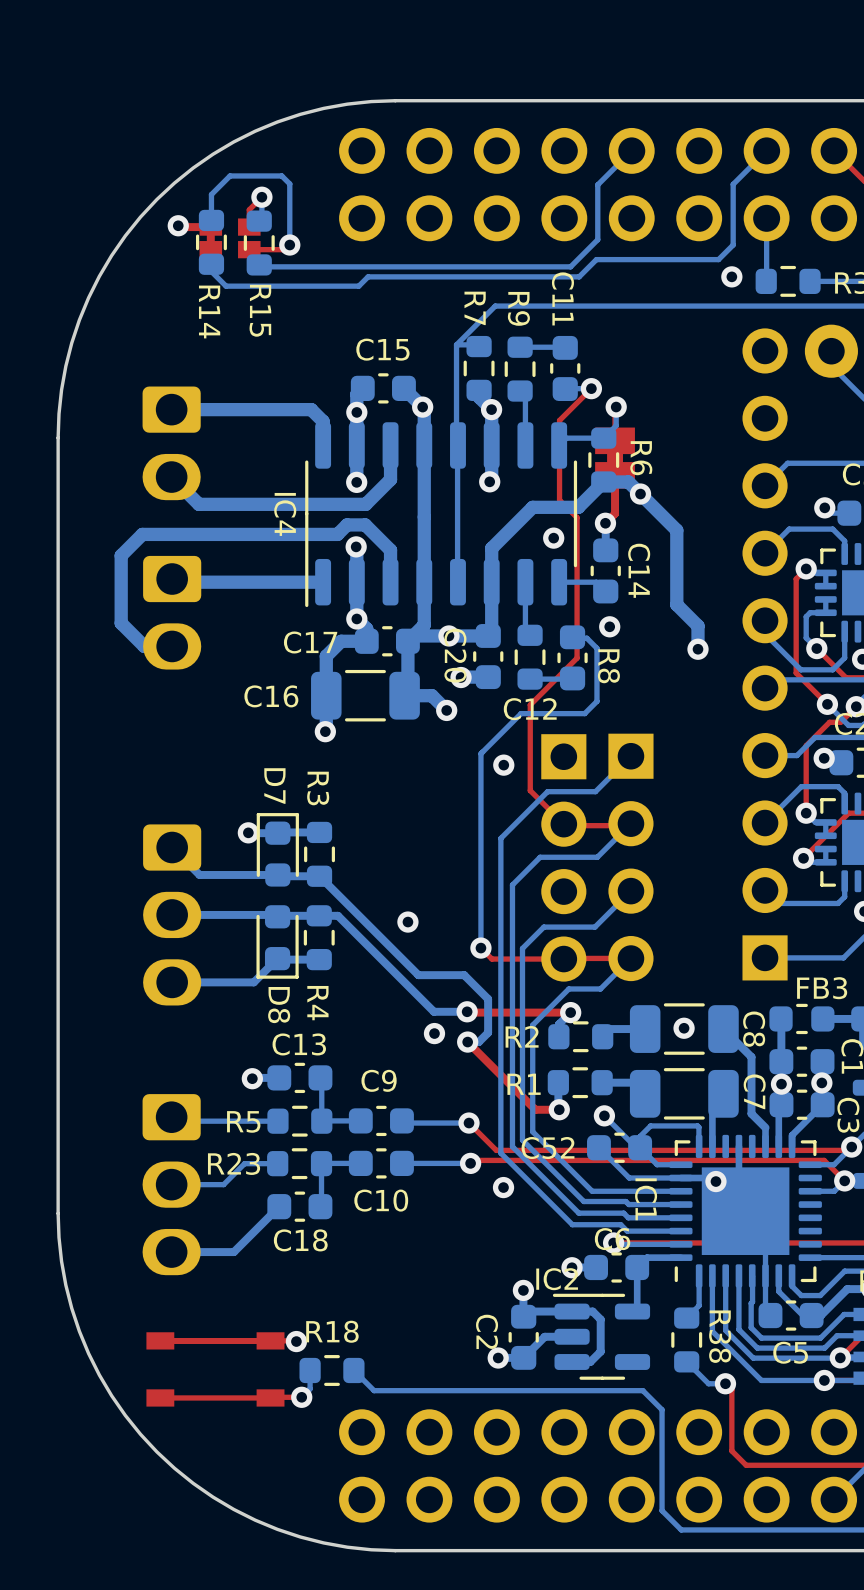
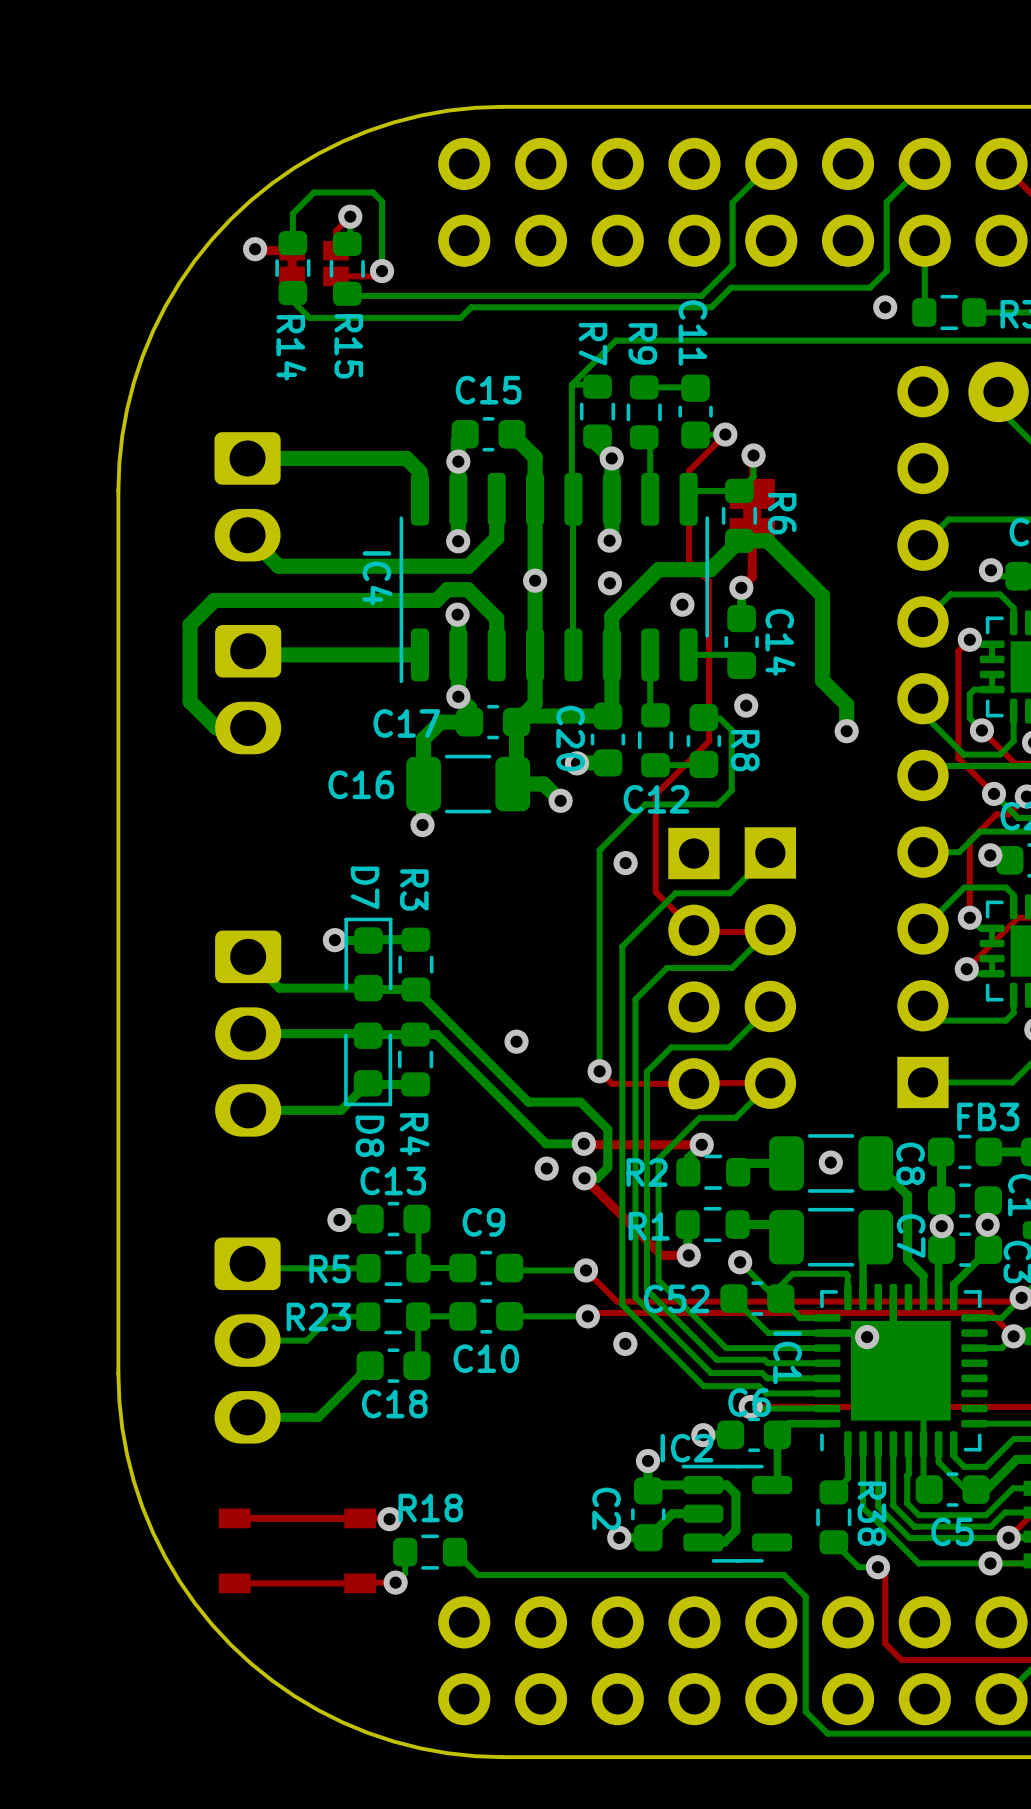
via: (422, 407) -> none
via: (640, 494) -> none
via: none -> (535, 580)
via: none -> (609, 583)
via: (448, 635) -> none

